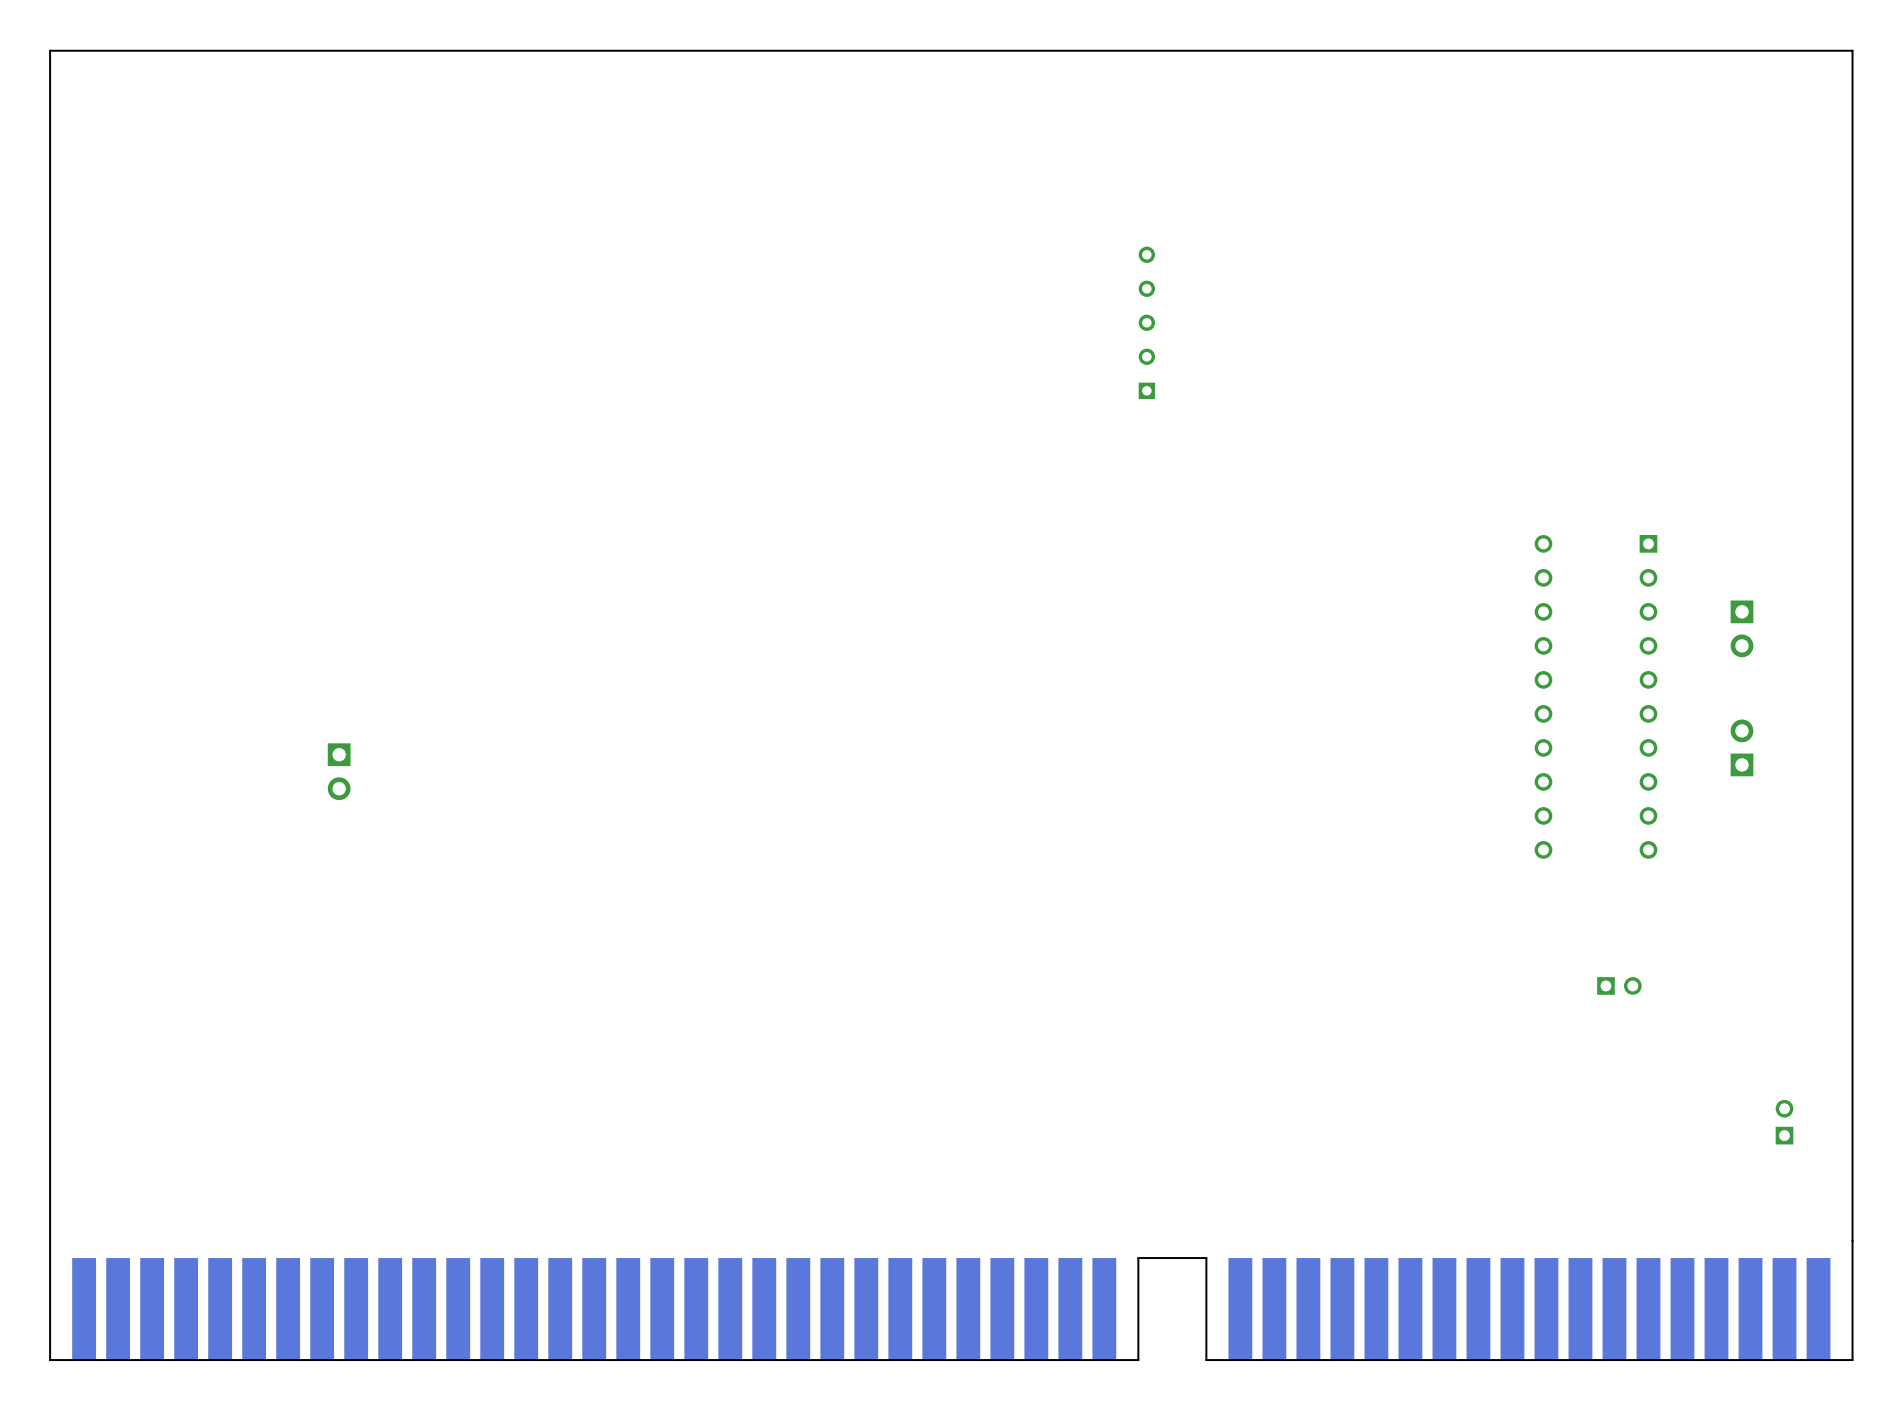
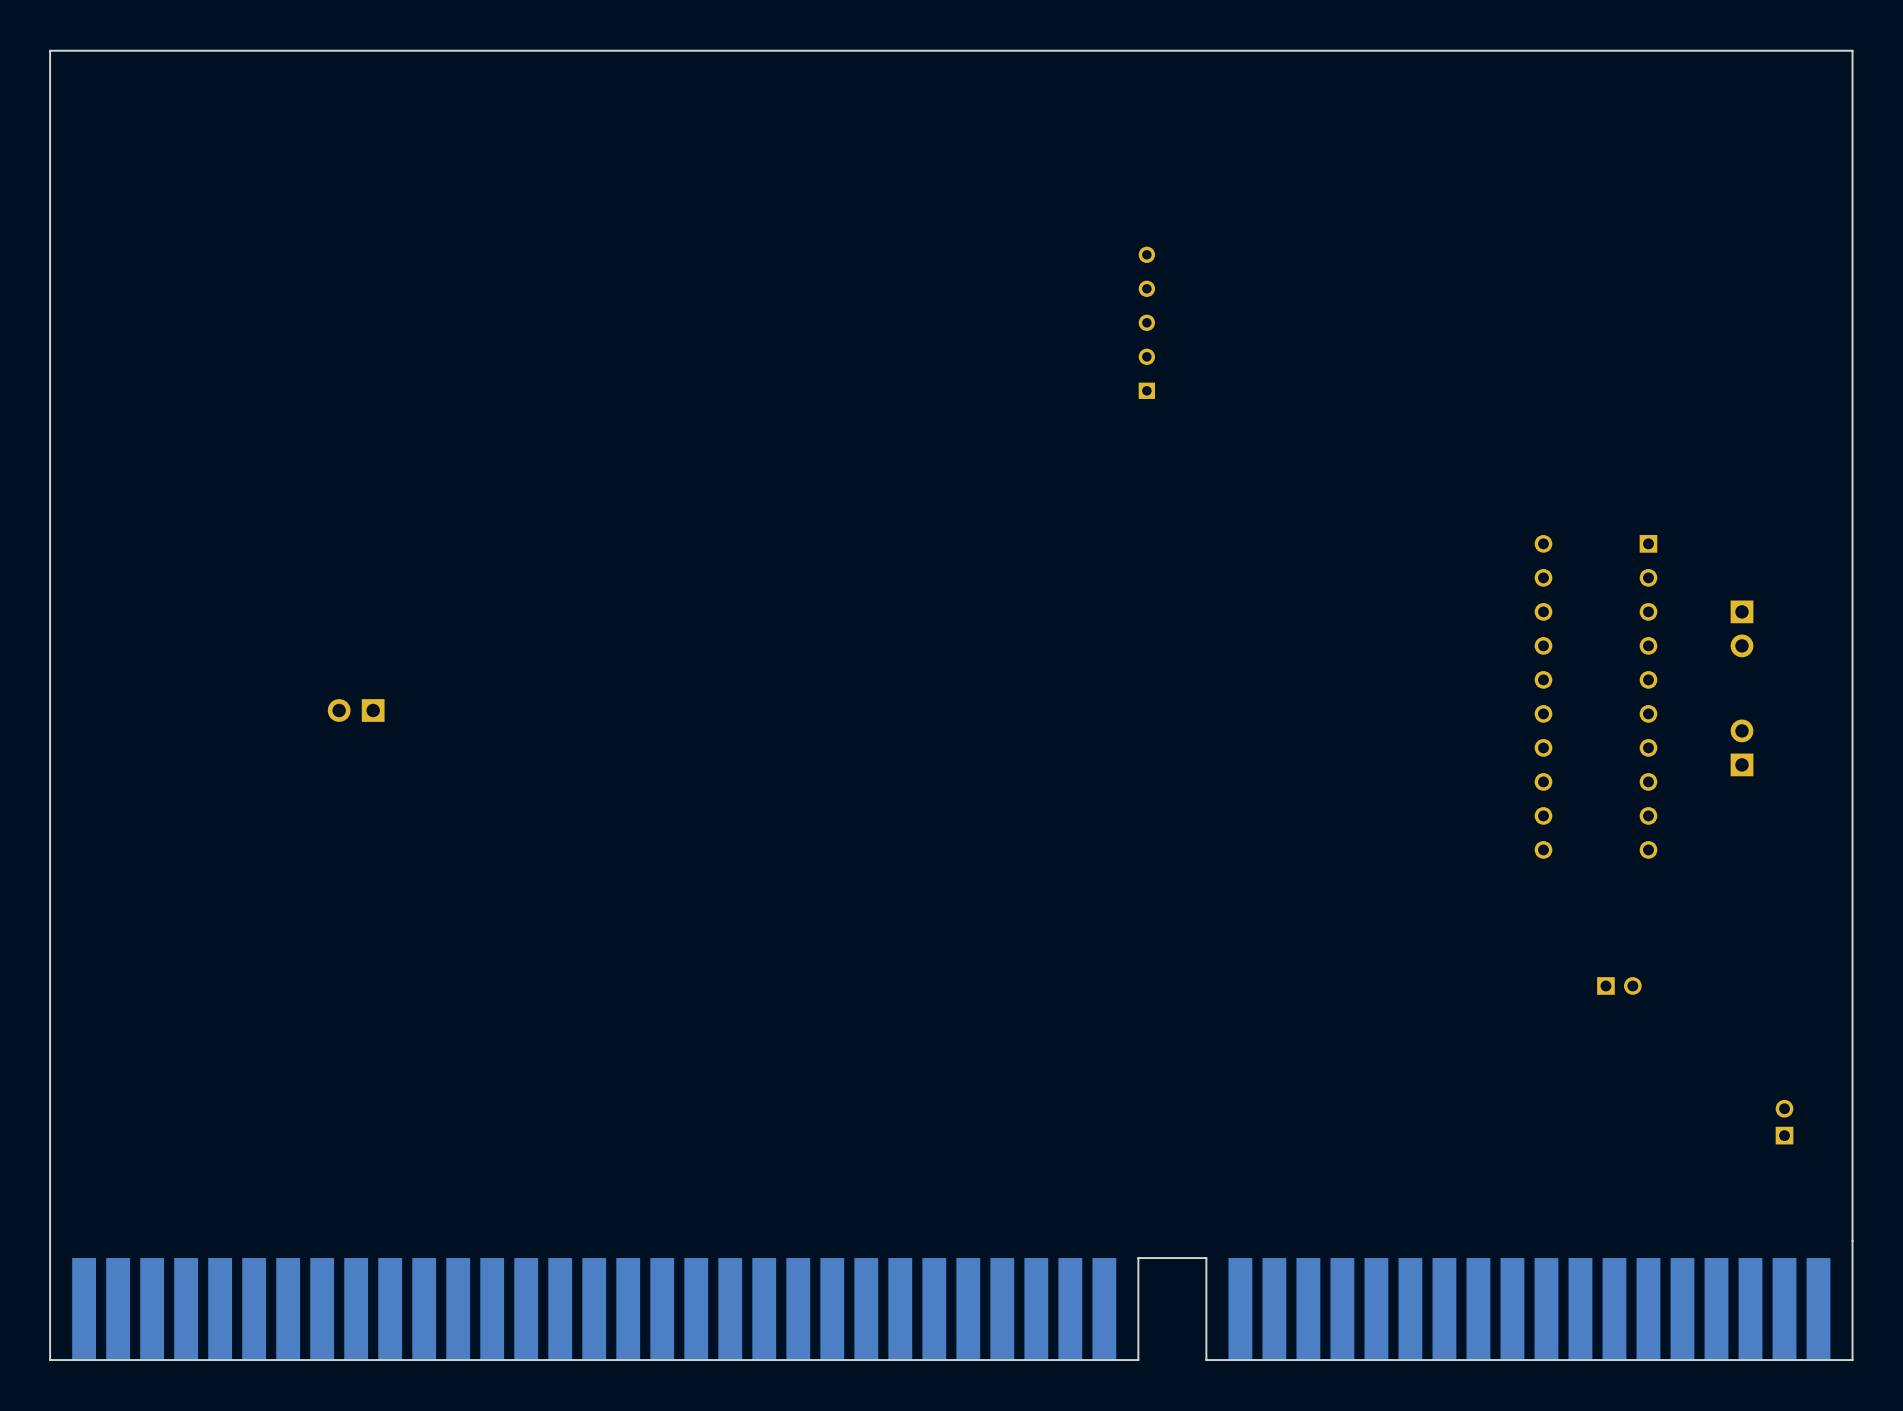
part rotation: 0° (339, 771) -> 90° clockwise (356, 710)
part position: (339, 771) -> (356, 710)

